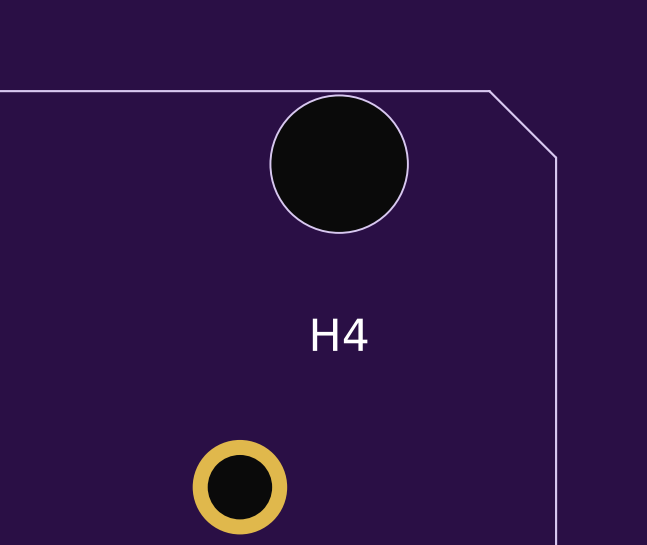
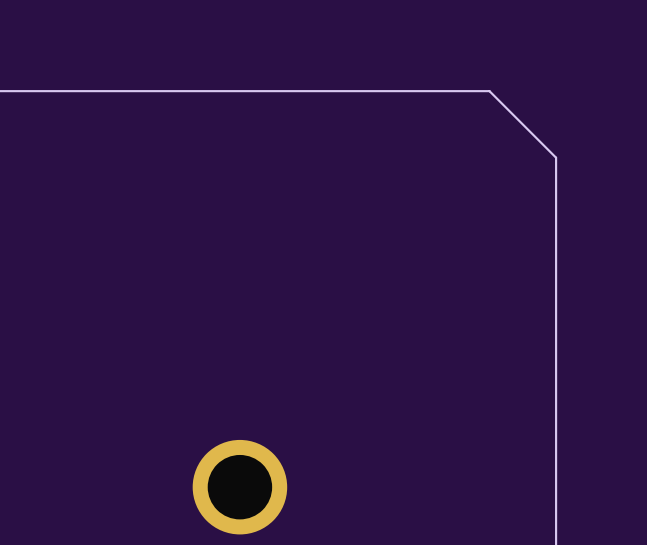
H4: (339, 164) -> none

